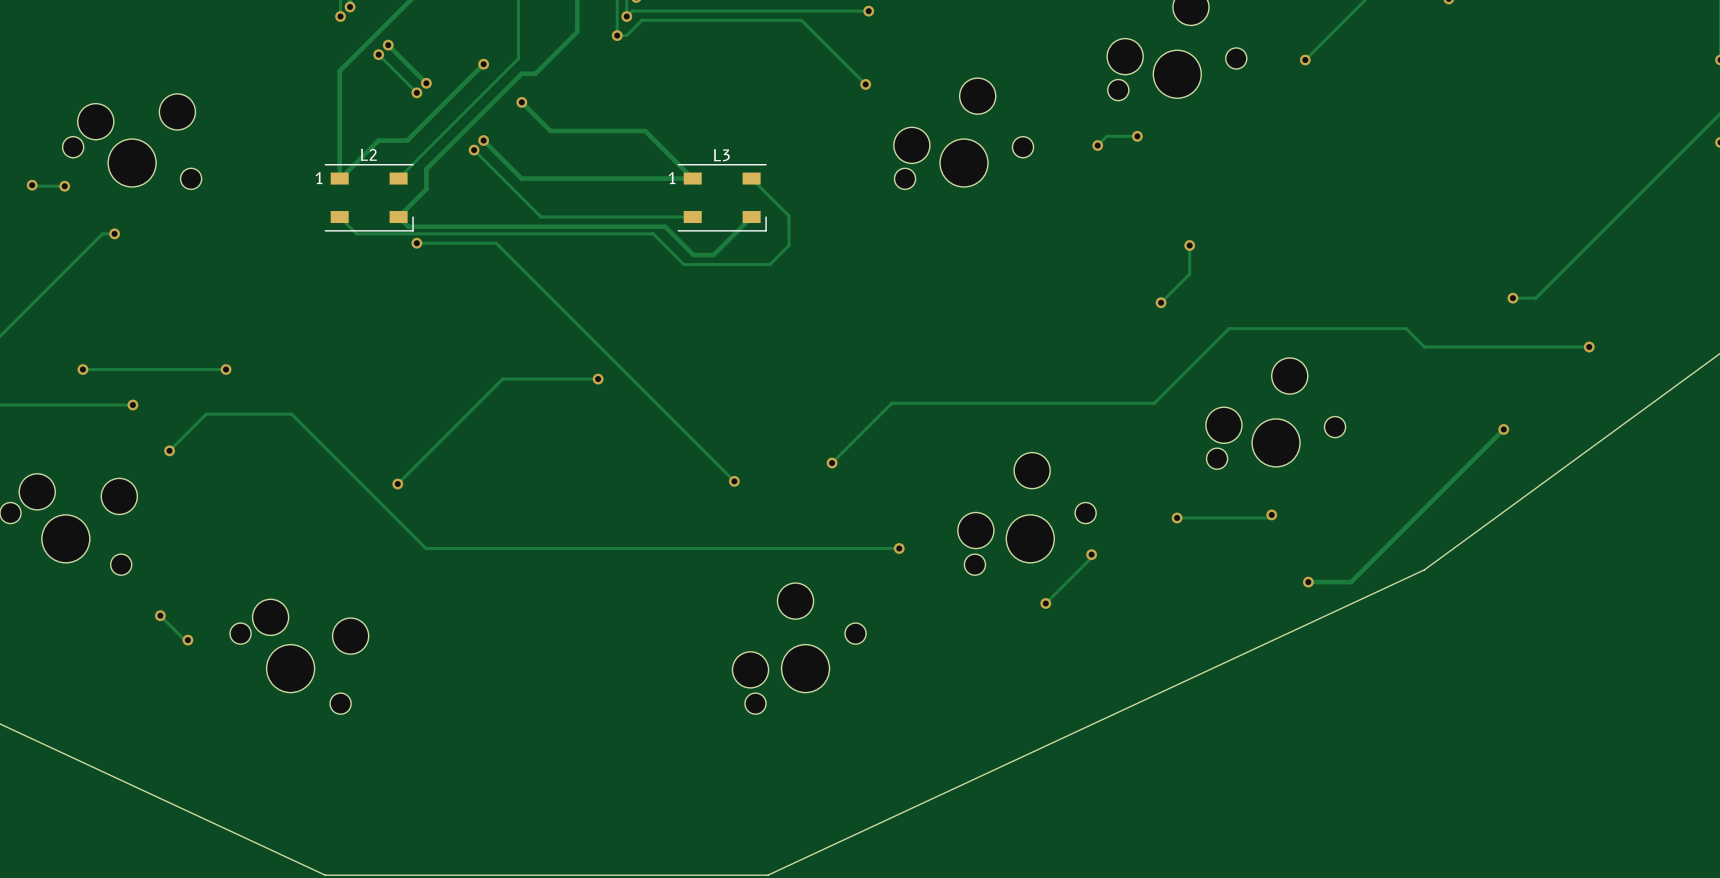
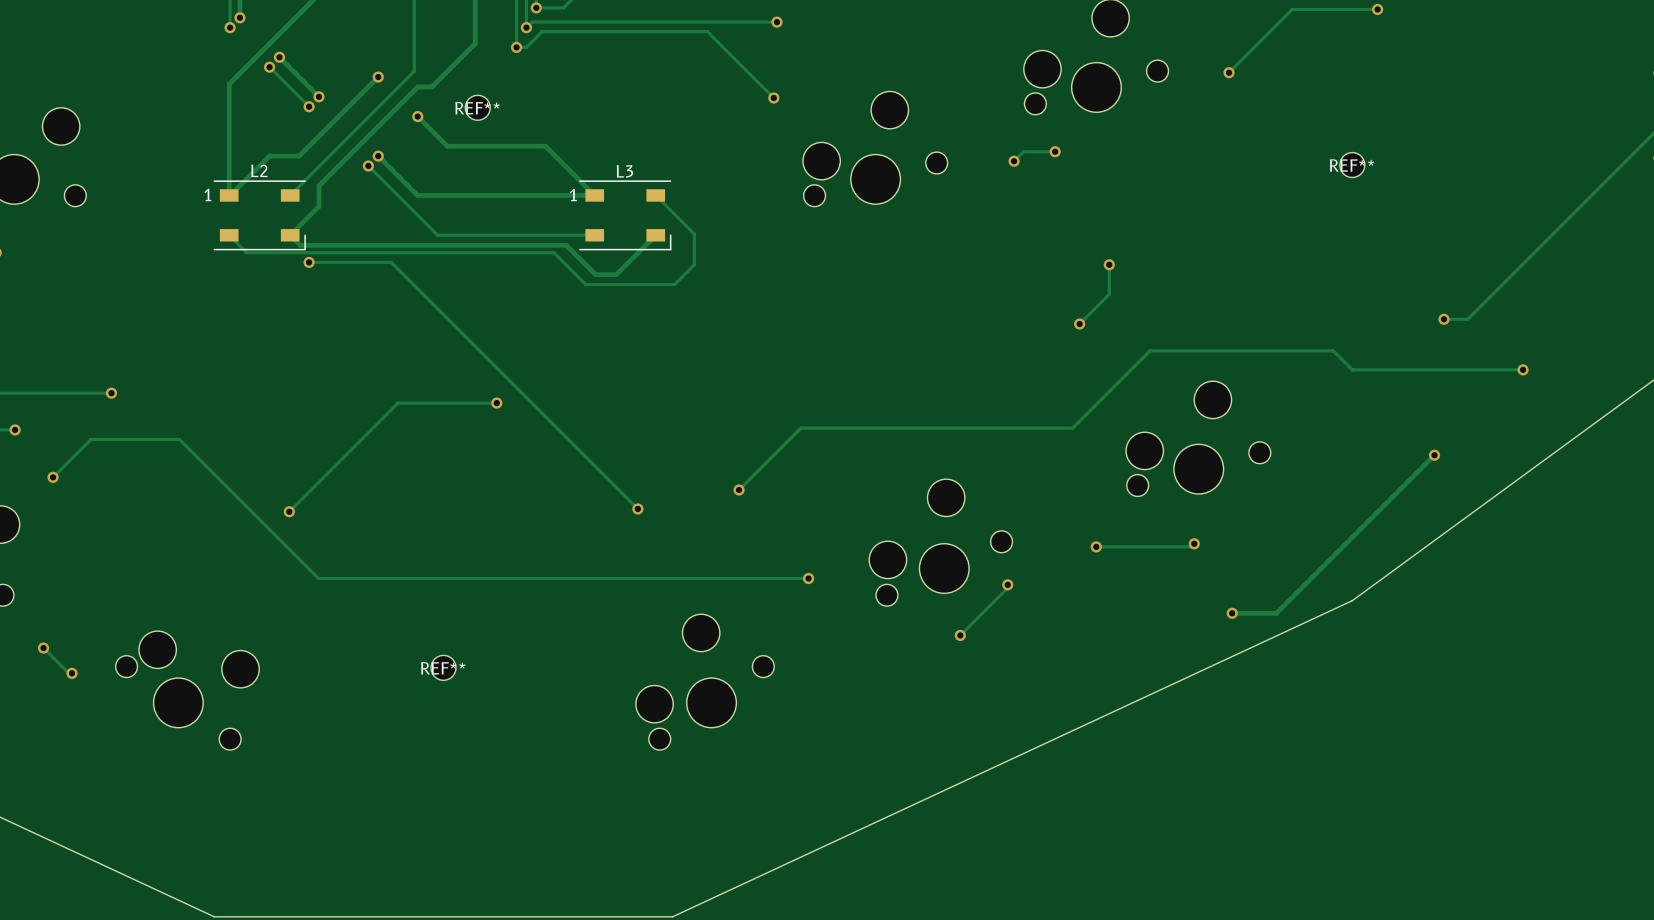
REF**: none -> (477, 107)
REF**: none -> (1352, 165)
REF**: none -> (443, 667)

